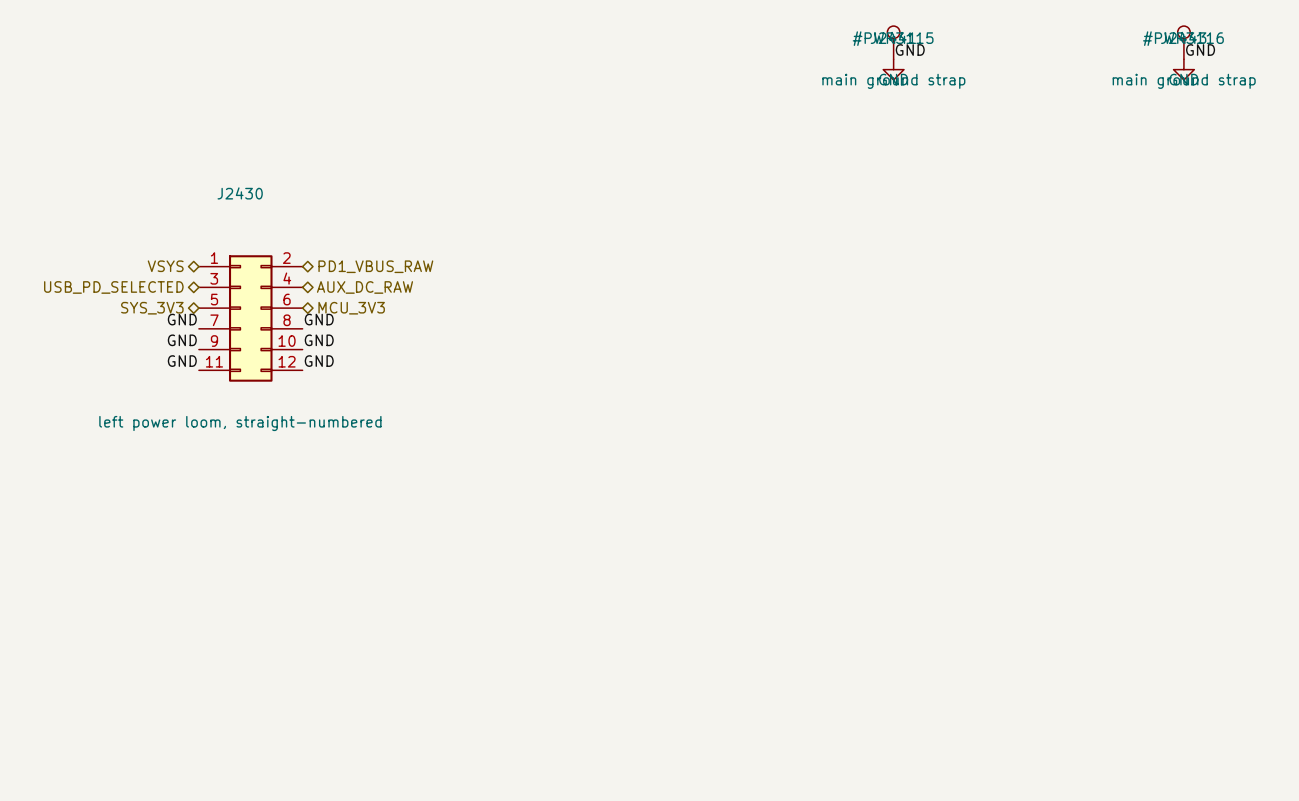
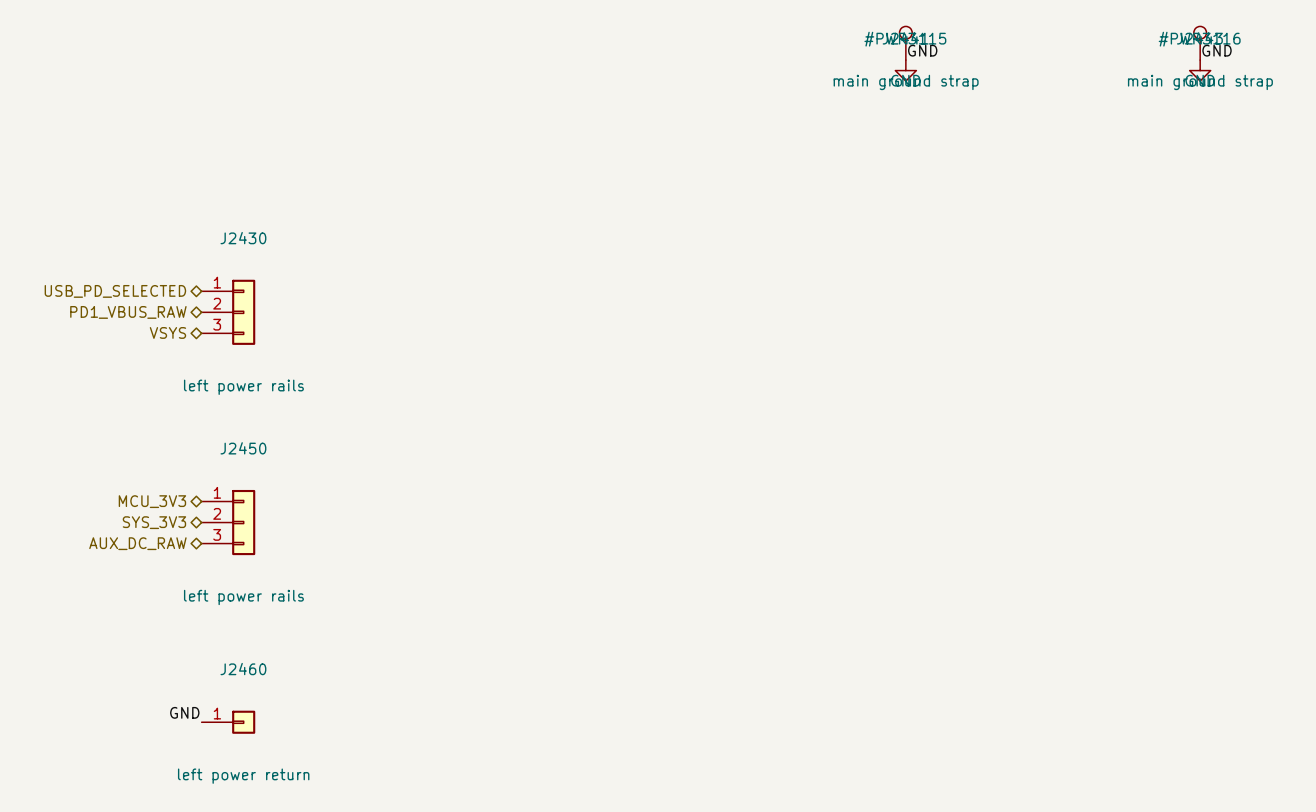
J2430 name position: J2430 (240, 193) -> J2430 (243, 238)
J2430 symbol: [198, 255, 303, 382] -> [201, 279, 256, 345]
hierarchical label position: VSYS (165, 266) -> VSYS (167, 332)
hierarchical label: PD1_VBUS_RAW (375, 266) -> none
hierarchical label: AUX_DC_RAW (364, 287) -> none
hierarchical label: SYS_3V3 (152, 308) -> PD1_VBUS_RAW (128, 312)
hierarchical label: MCU_3V3 (351, 308) -> none
label: GND (182, 319) -> none
label: GND (319, 319) -> none
label: GND (182, 340) -> none
label: GND (319, 340) -> none
label: GND (182, 361) -> none
label: GND (319, 361) -> none
J2430 value: left power loom, straight-numbered (240, 423) -> left power rails (243, 387)
hierarchical label: none -> MCU_3V3 (152, 501)
hierarchical label: none -> SYS_3V3 (154, 522)
J2450: none -> left power rails (228, 522)
hierarchical label: none -> AUX_DC_RAW (137, 543)
label: none -> GND (184, 712)
J2460: none -> left power return (228, 722)

